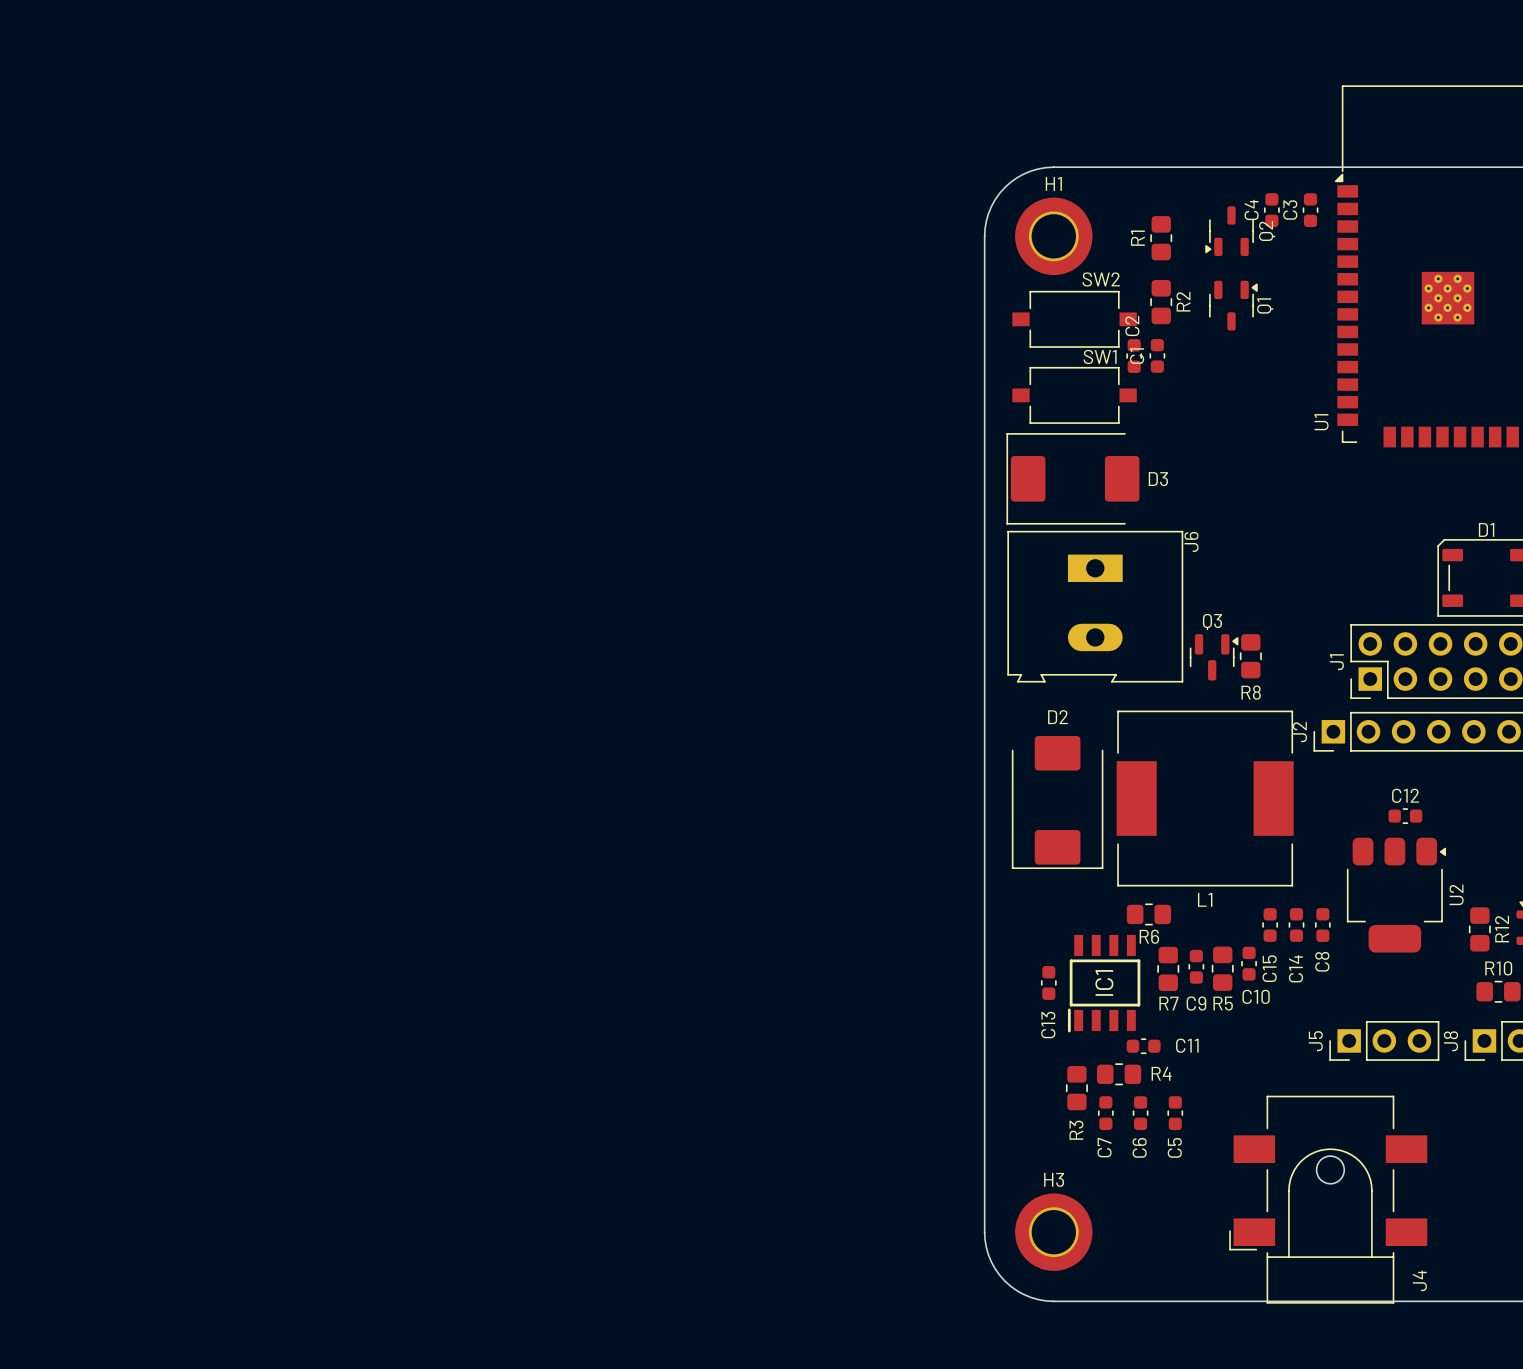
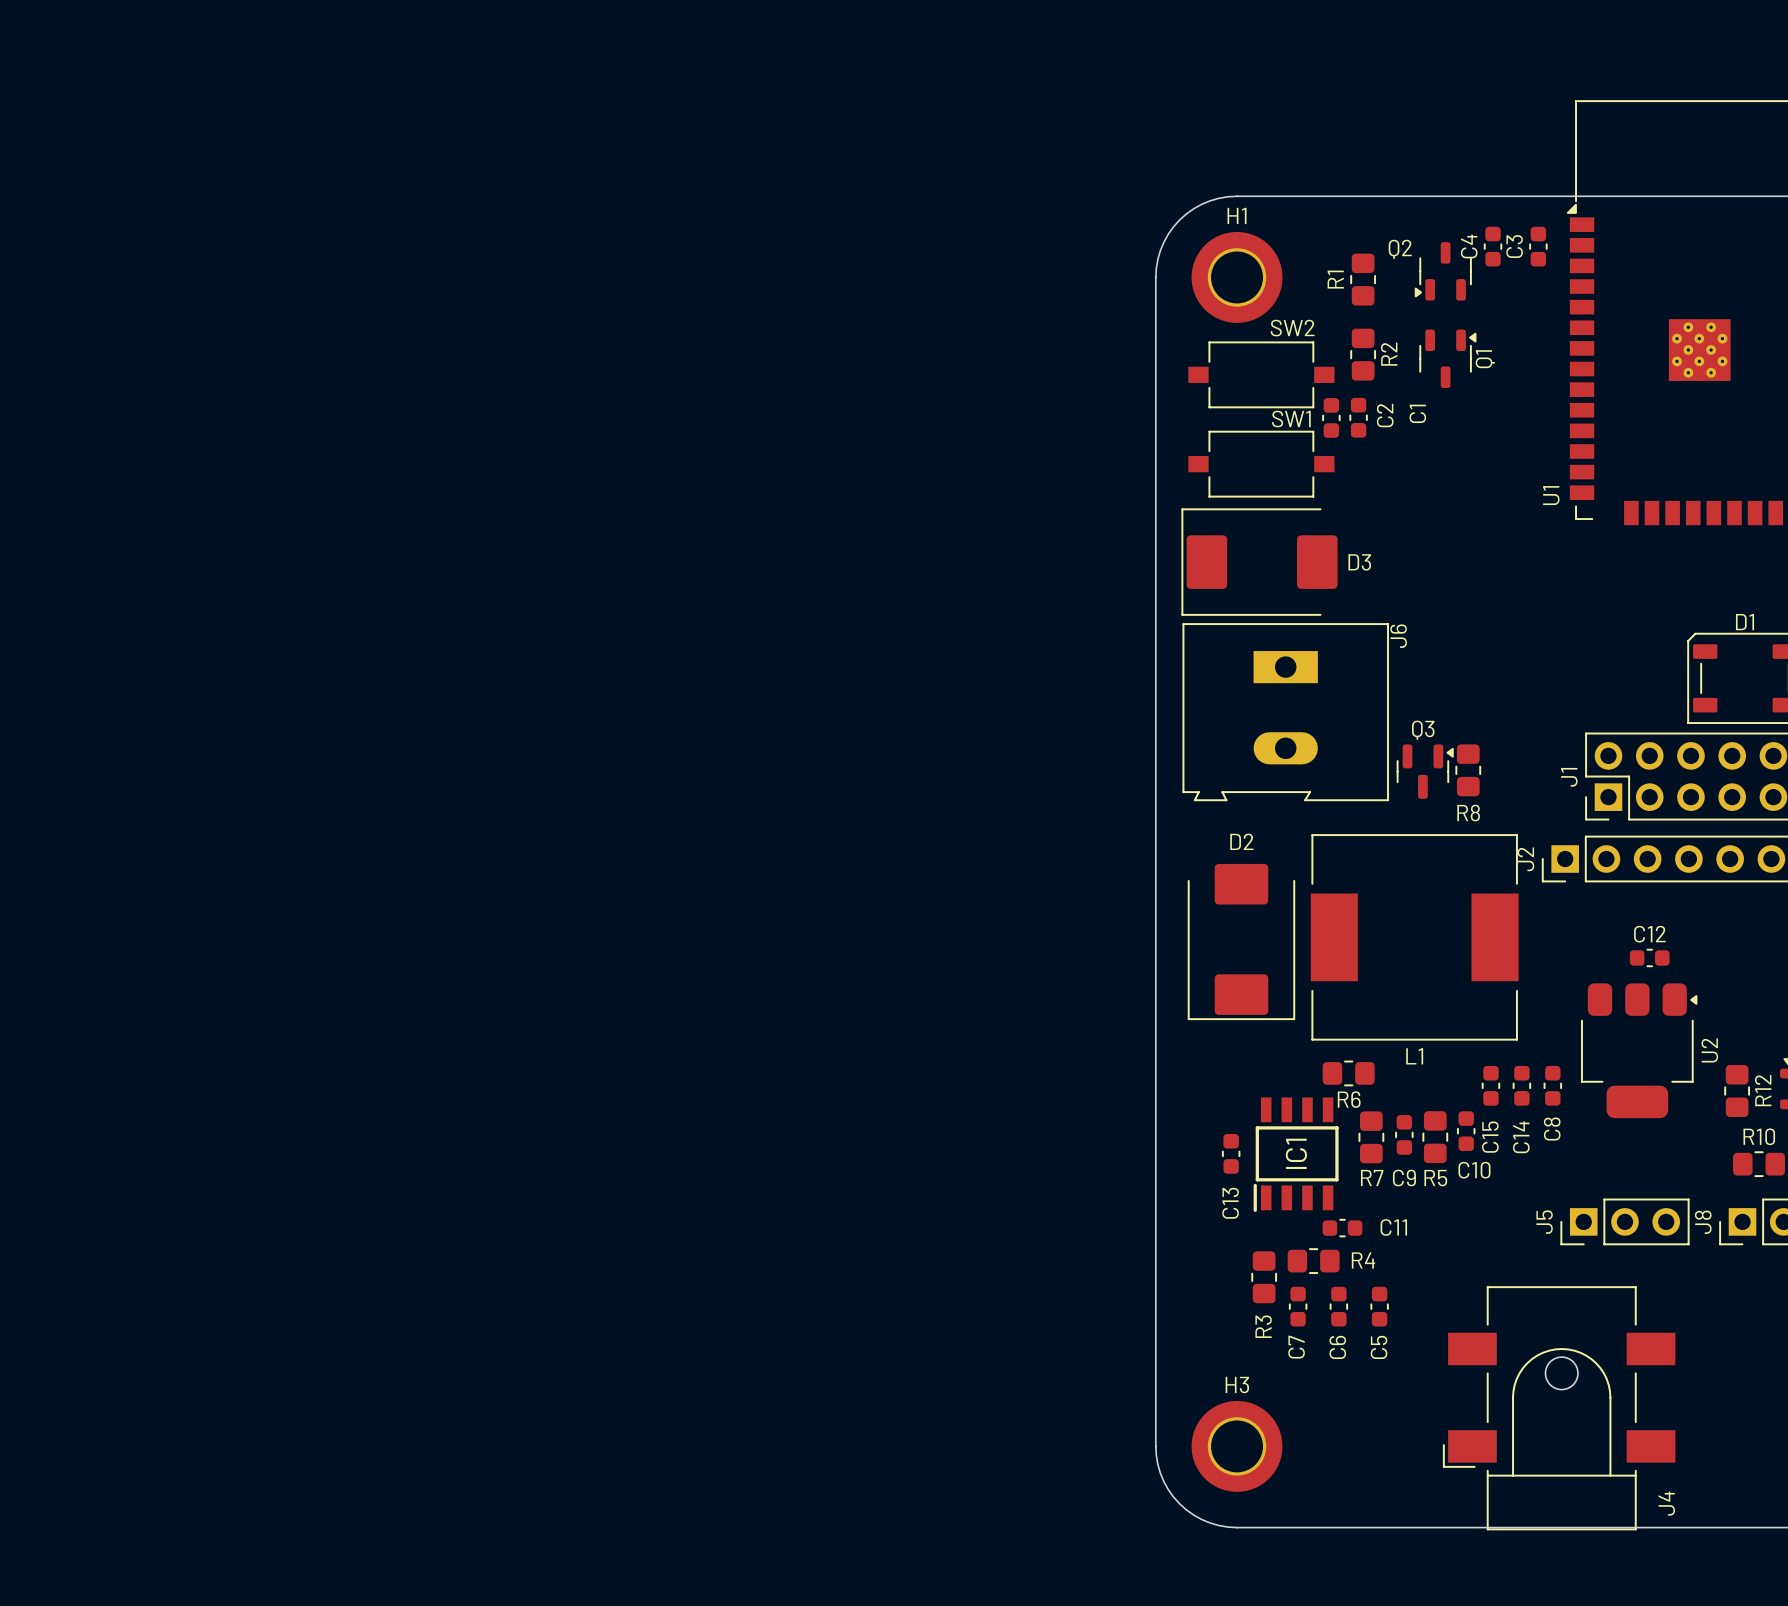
Q2 name rotation: 0° (1267, 231) -> 90° clockwise (1400, 249)
Q2 name position: Q2 (1267, 231) -> Q2 (1400, 249)
C2 name position: C2 (1132, 326) -> C2 (1385, 415)
C1 name position: C1 (1137, 356) -> C1 (1417, 413)

